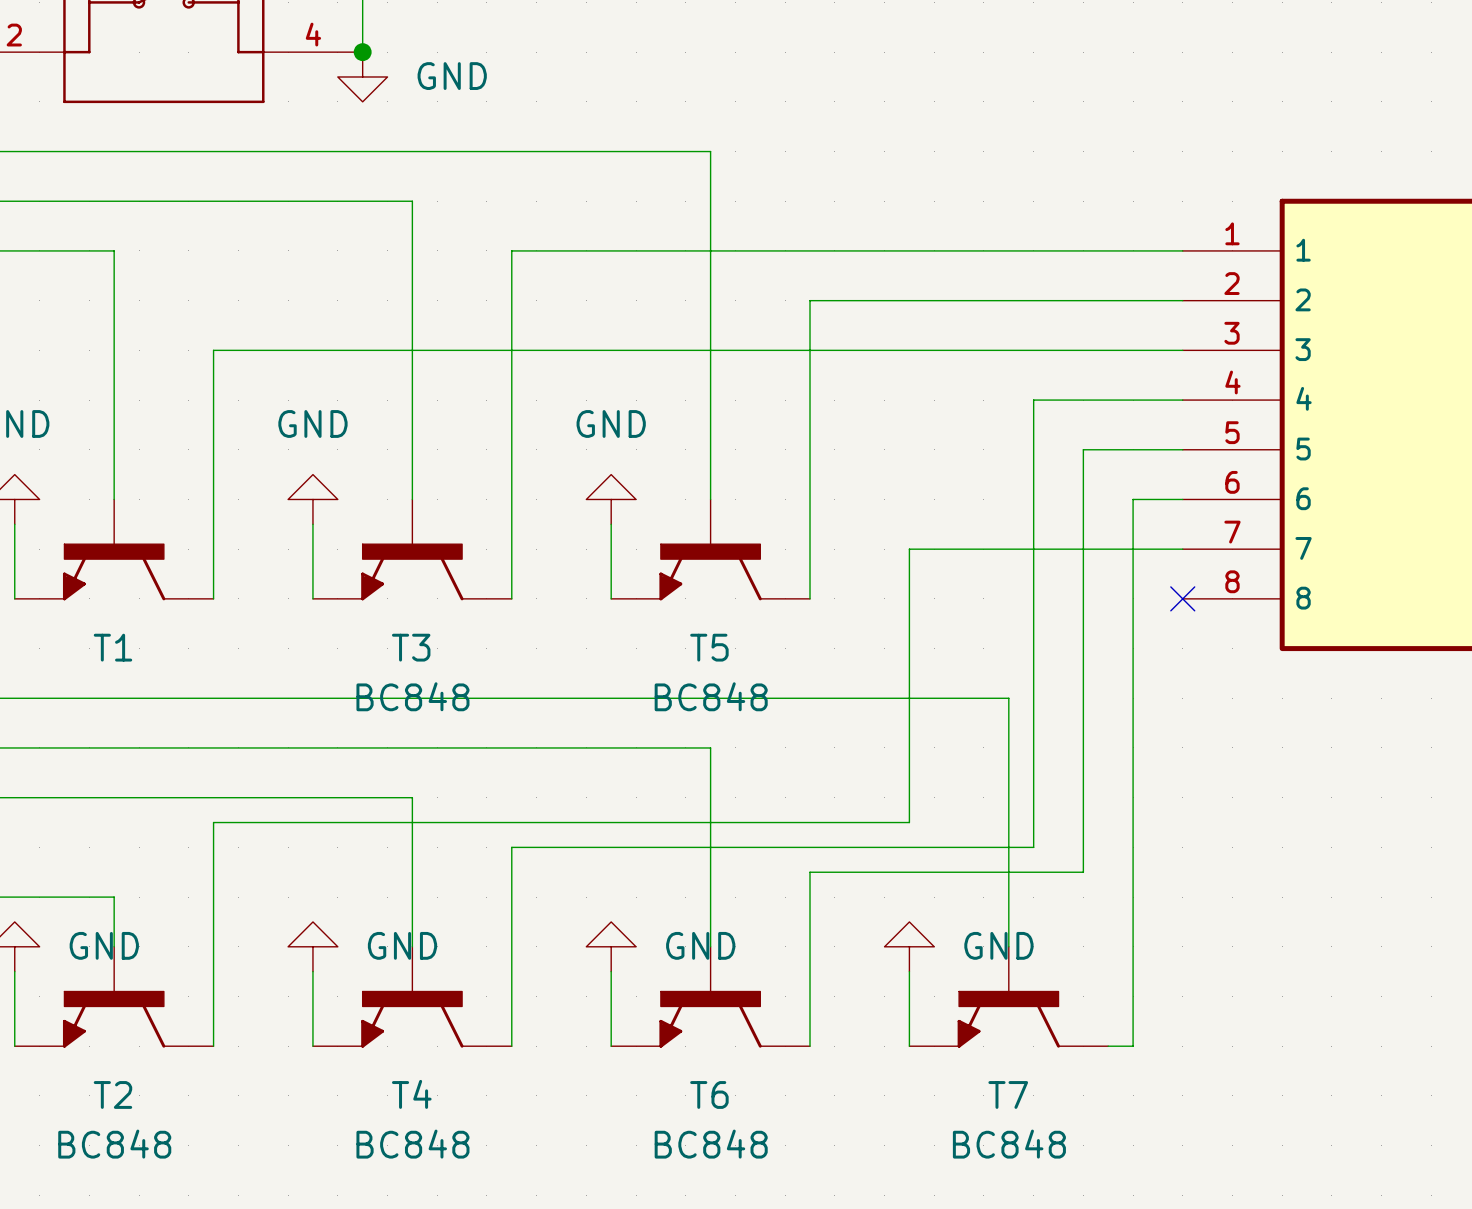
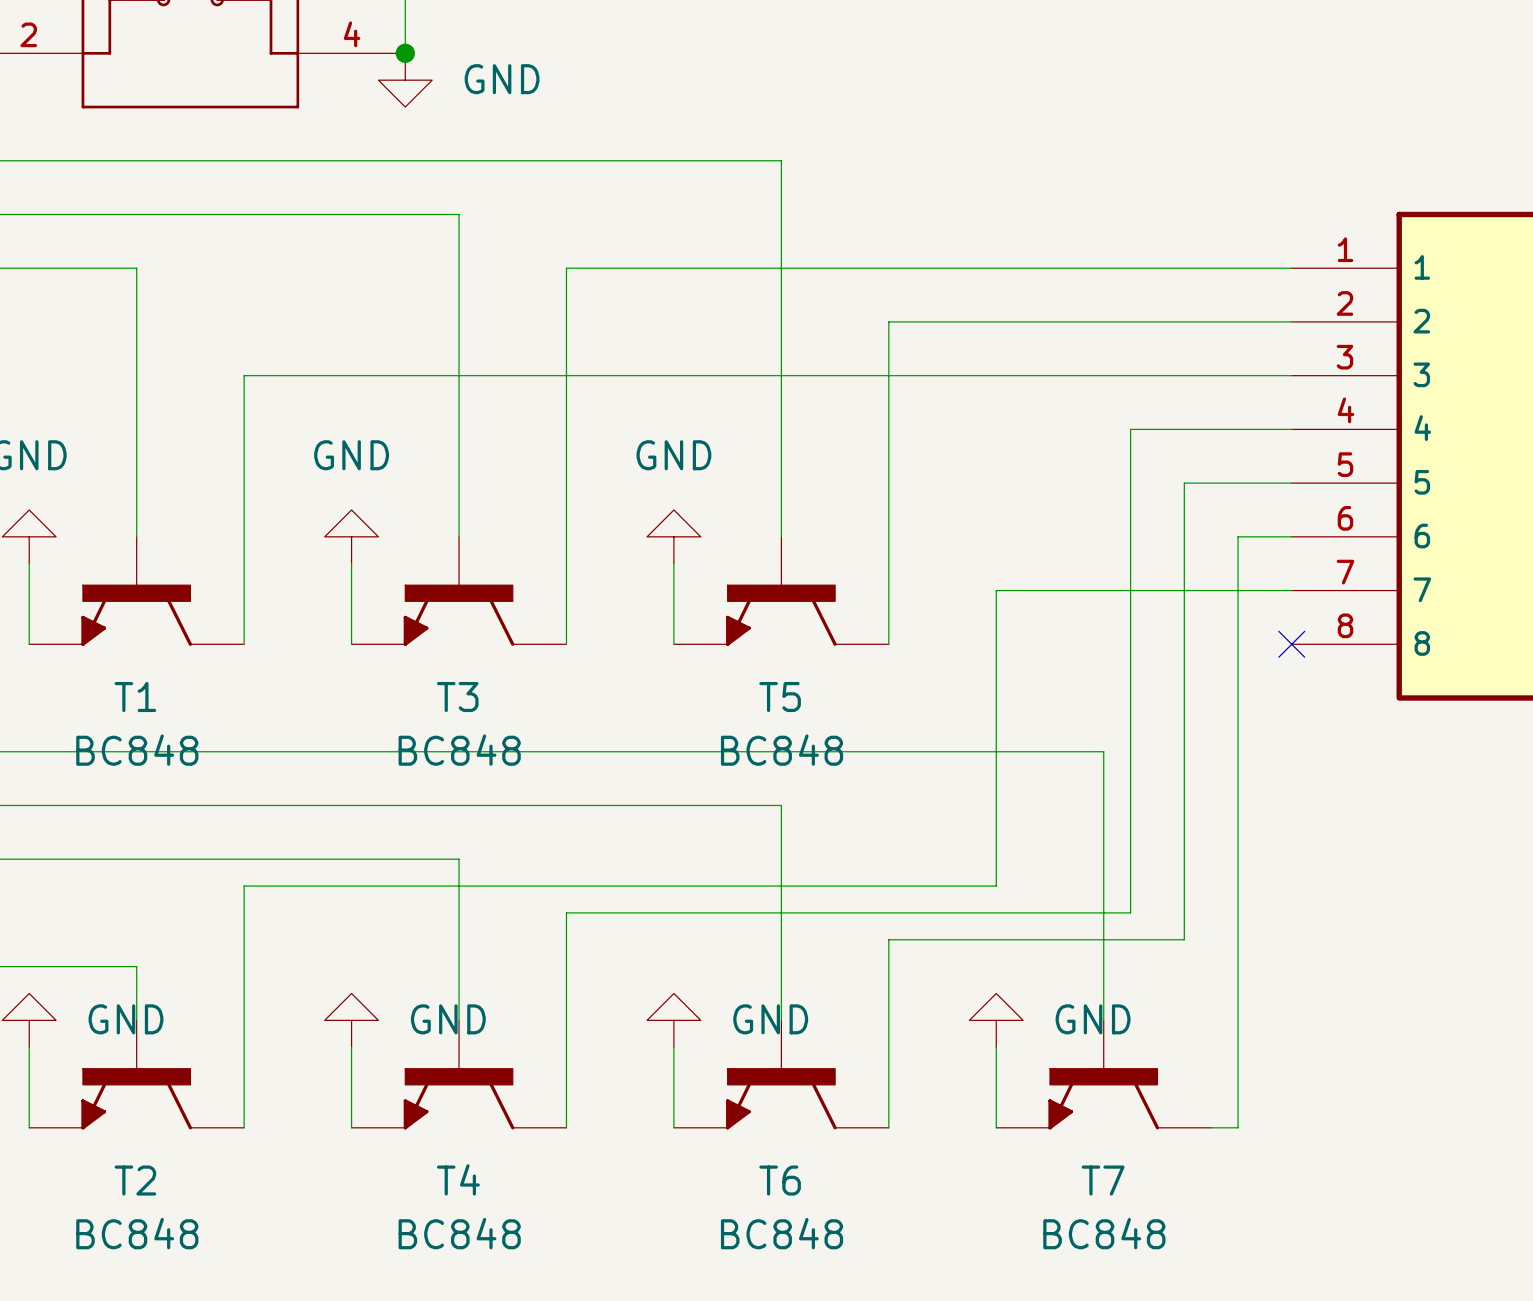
T1 value: none -> BC848 (137, 750)

